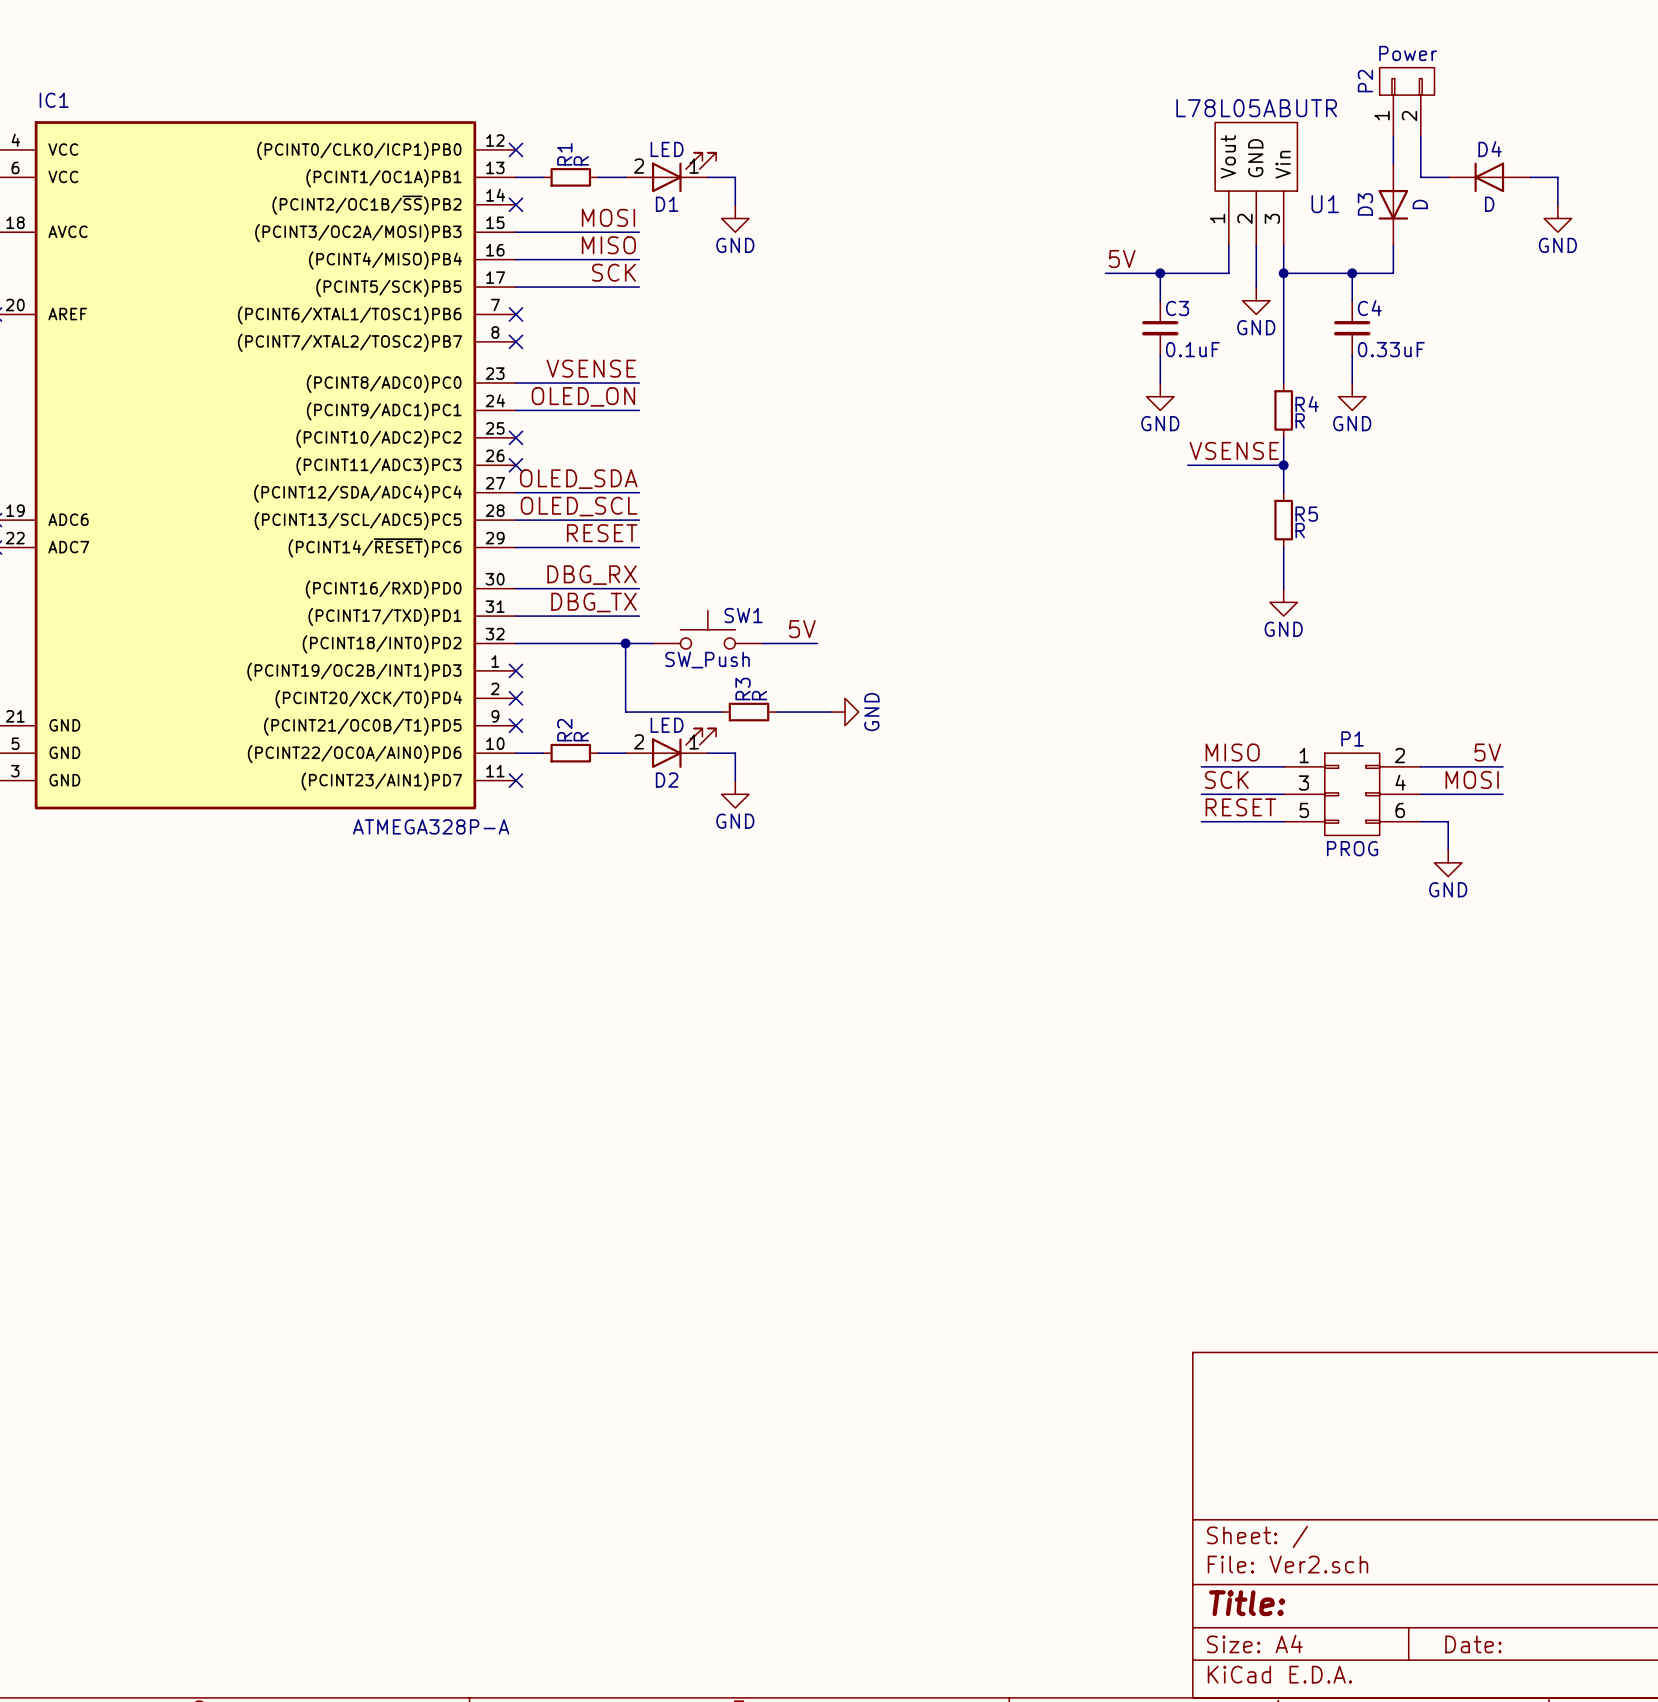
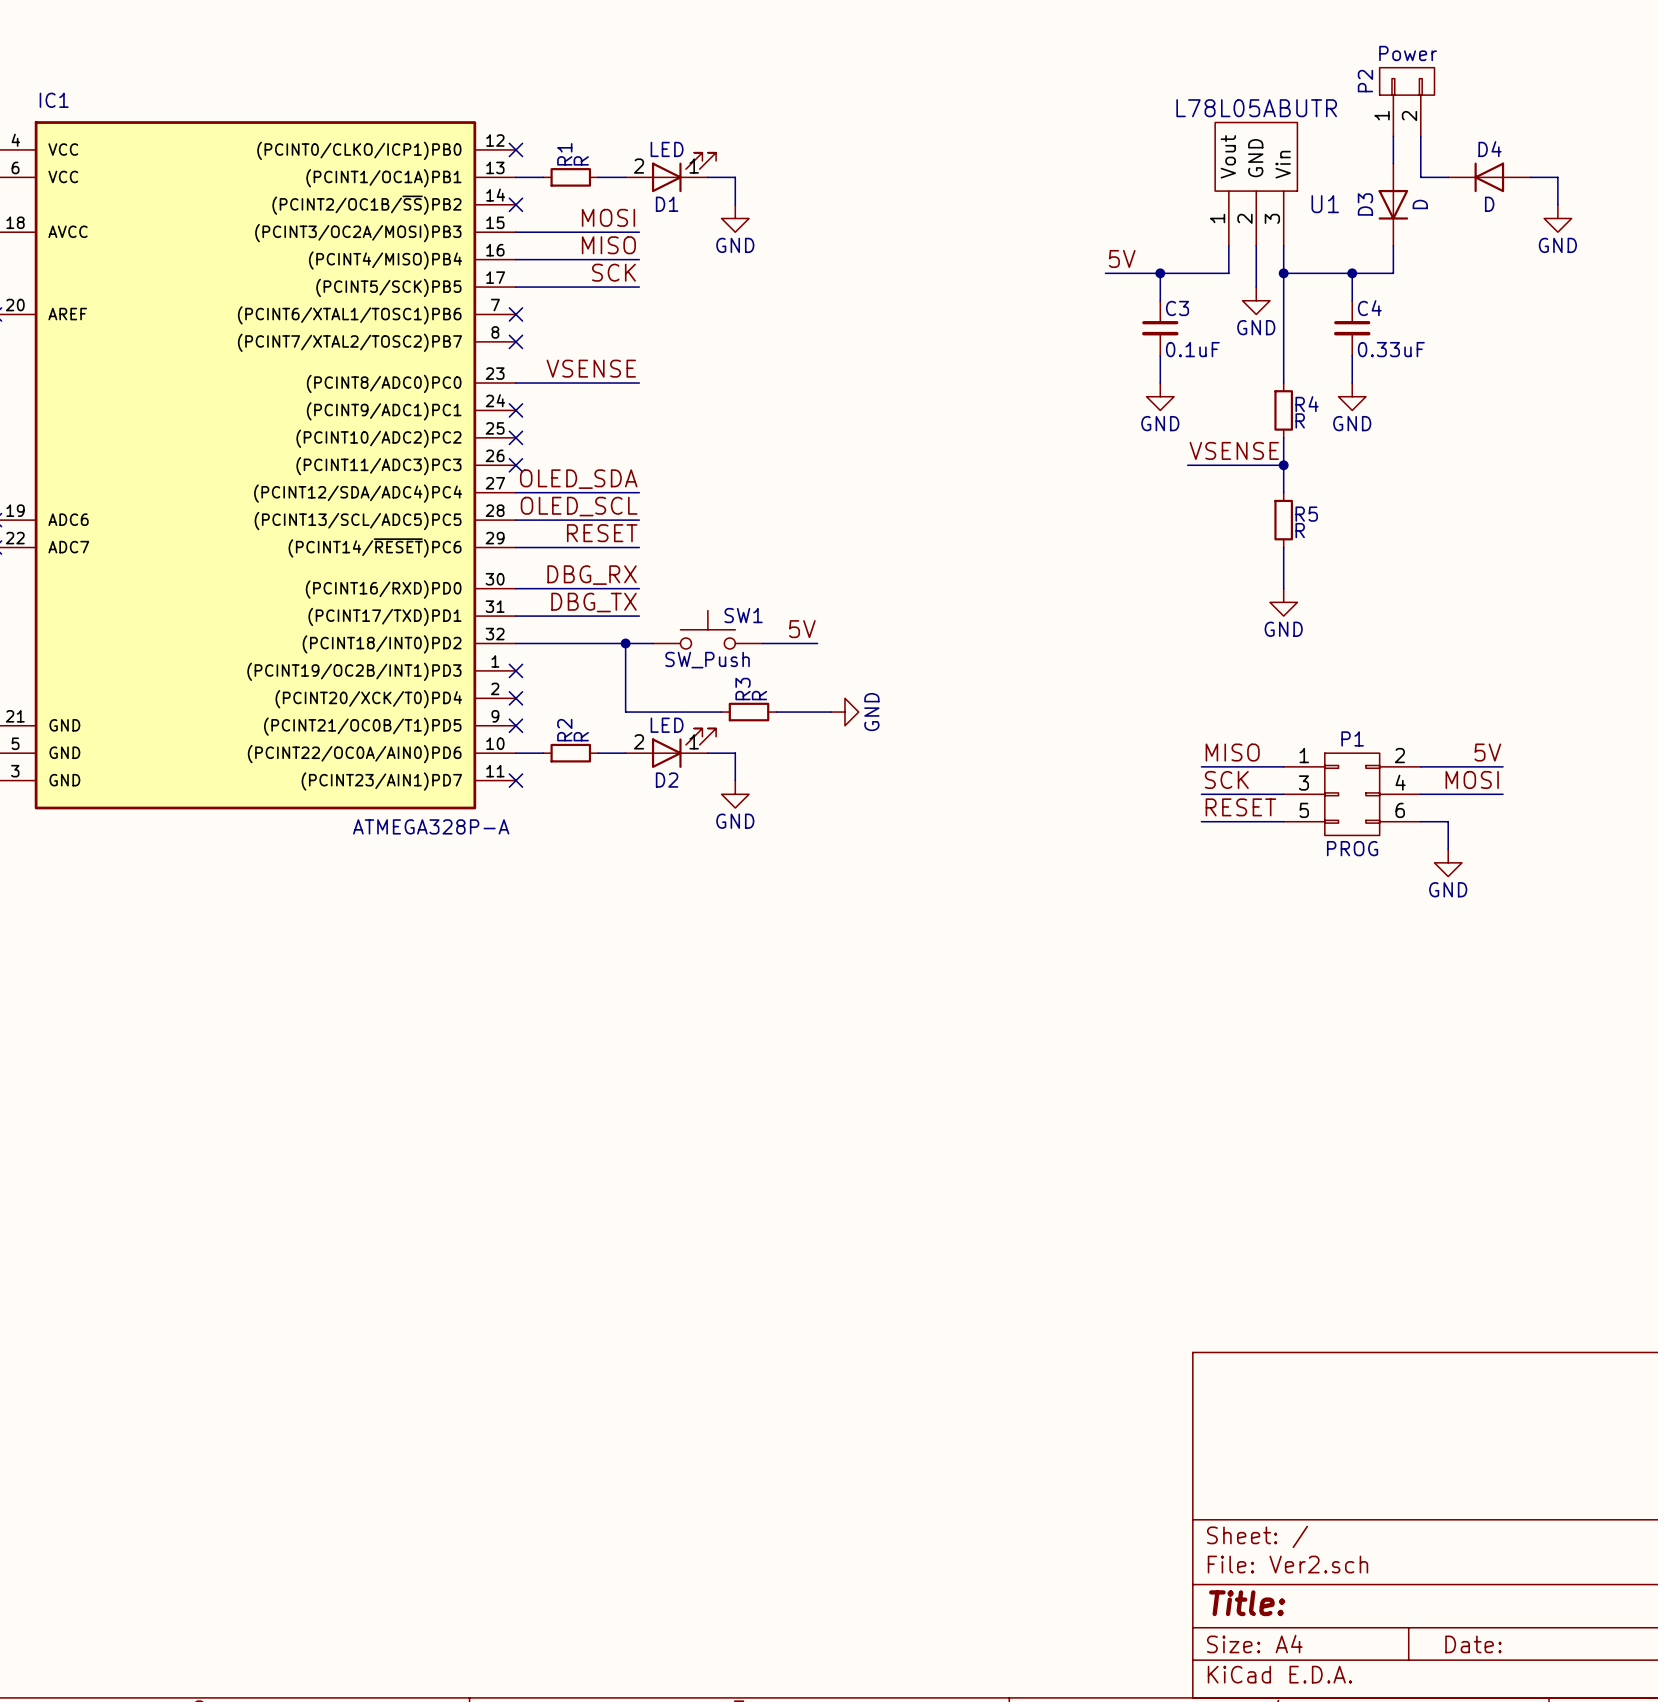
label: OLED_ON (583, 396) -> none
wire: (515, 410) (639, 410) -> none
no-connect mark: none -> (515, 410)

